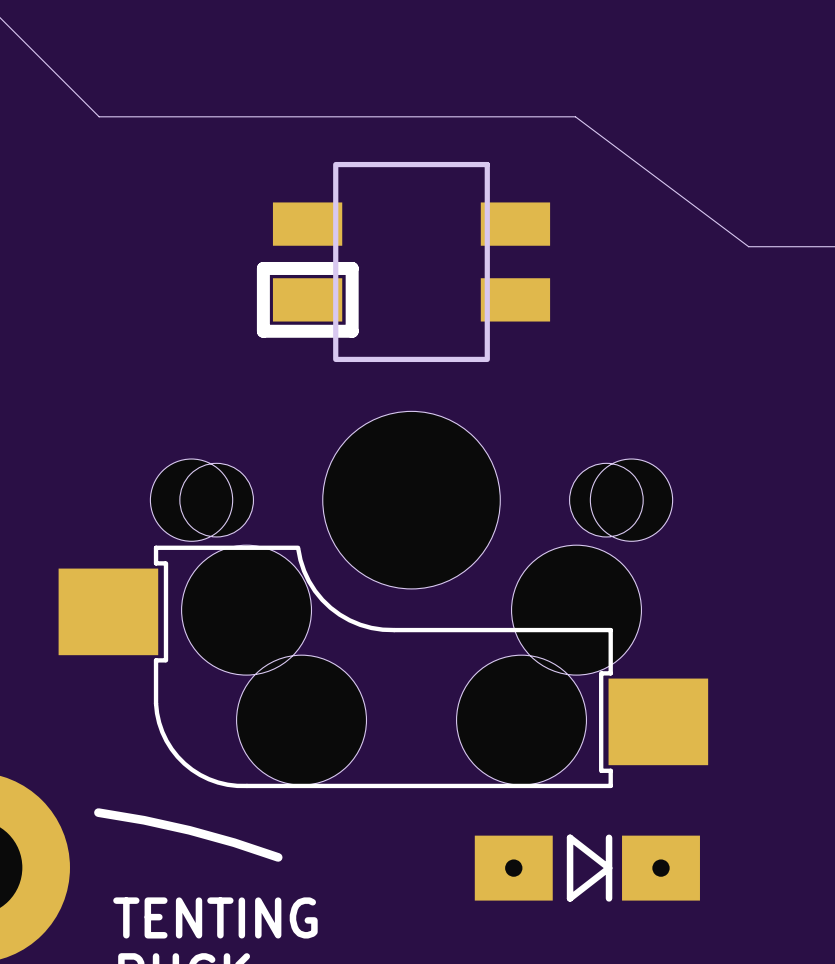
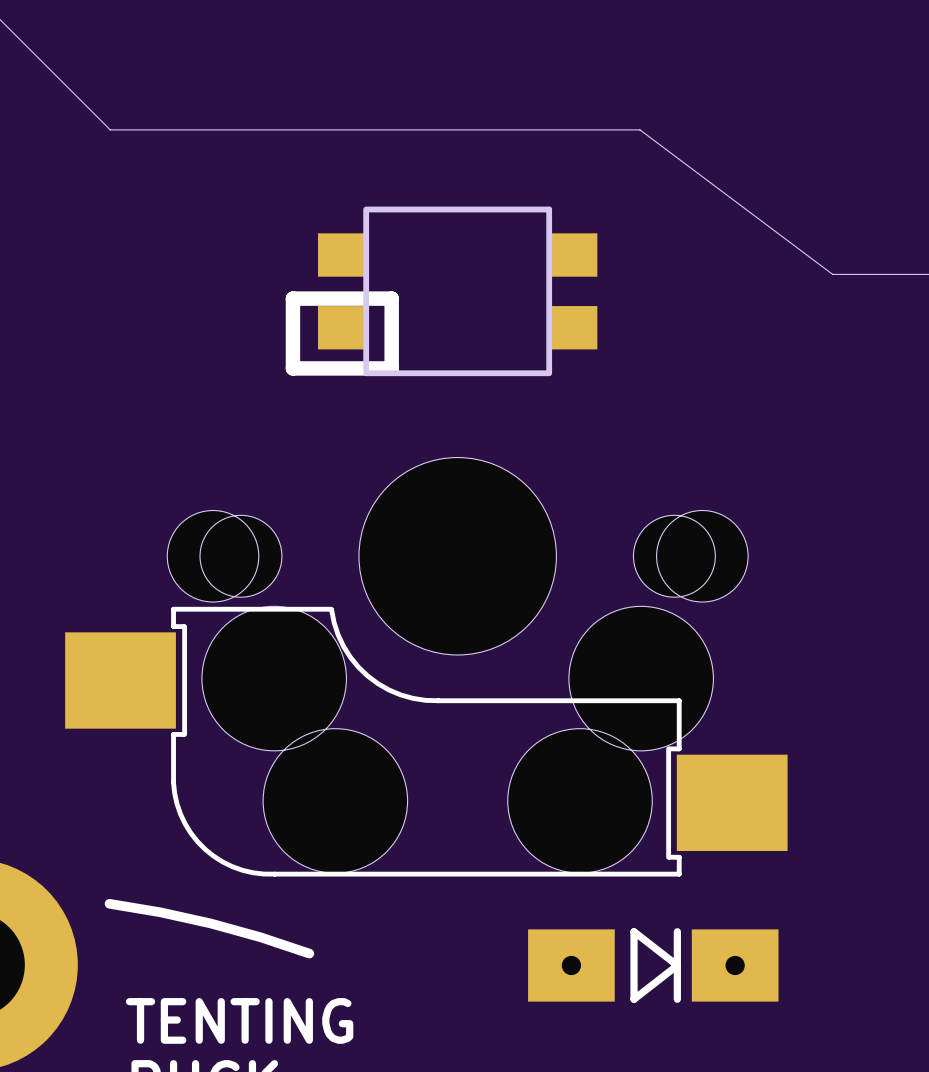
part footprint: [58, 161, 709, 789] -> [65, 206, 788, 877]

